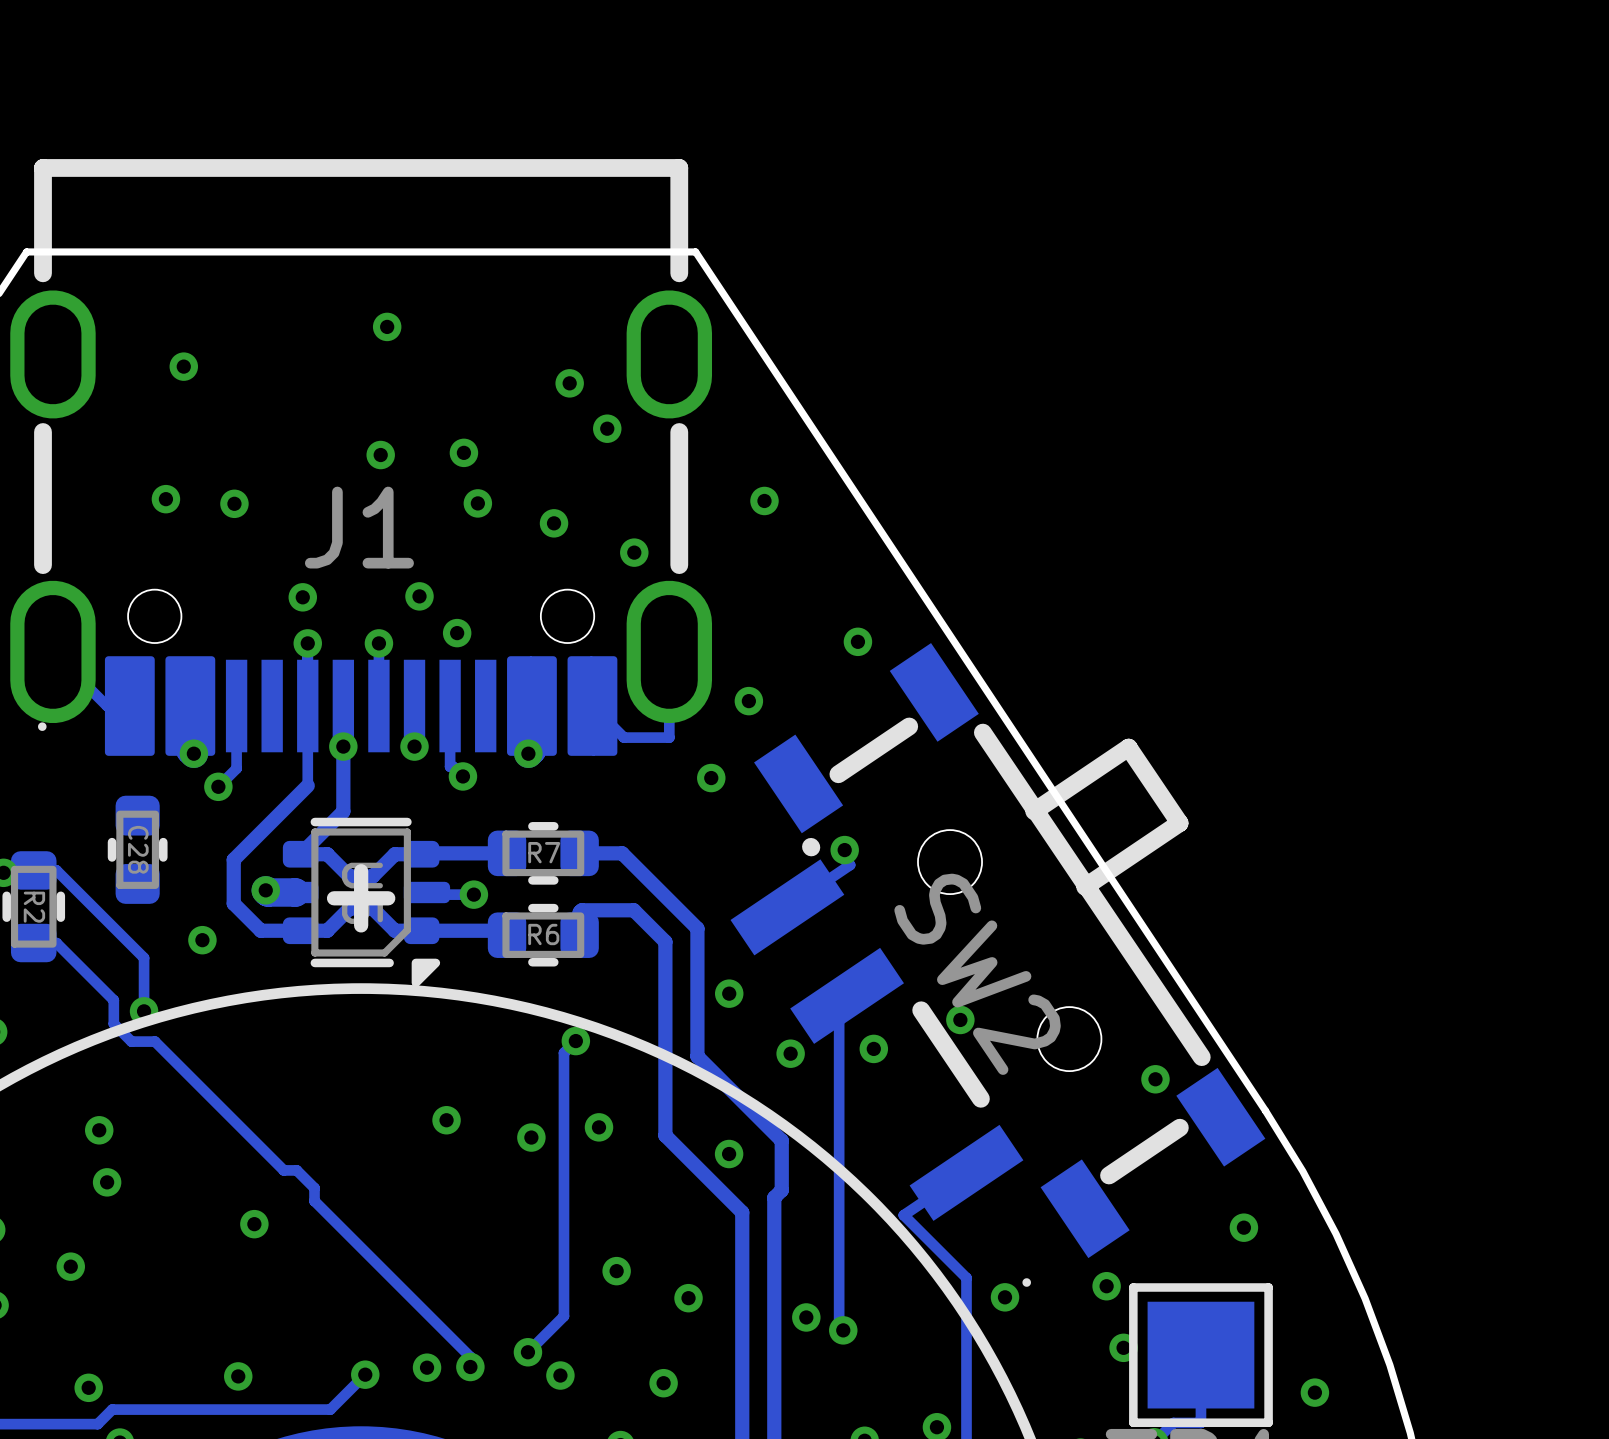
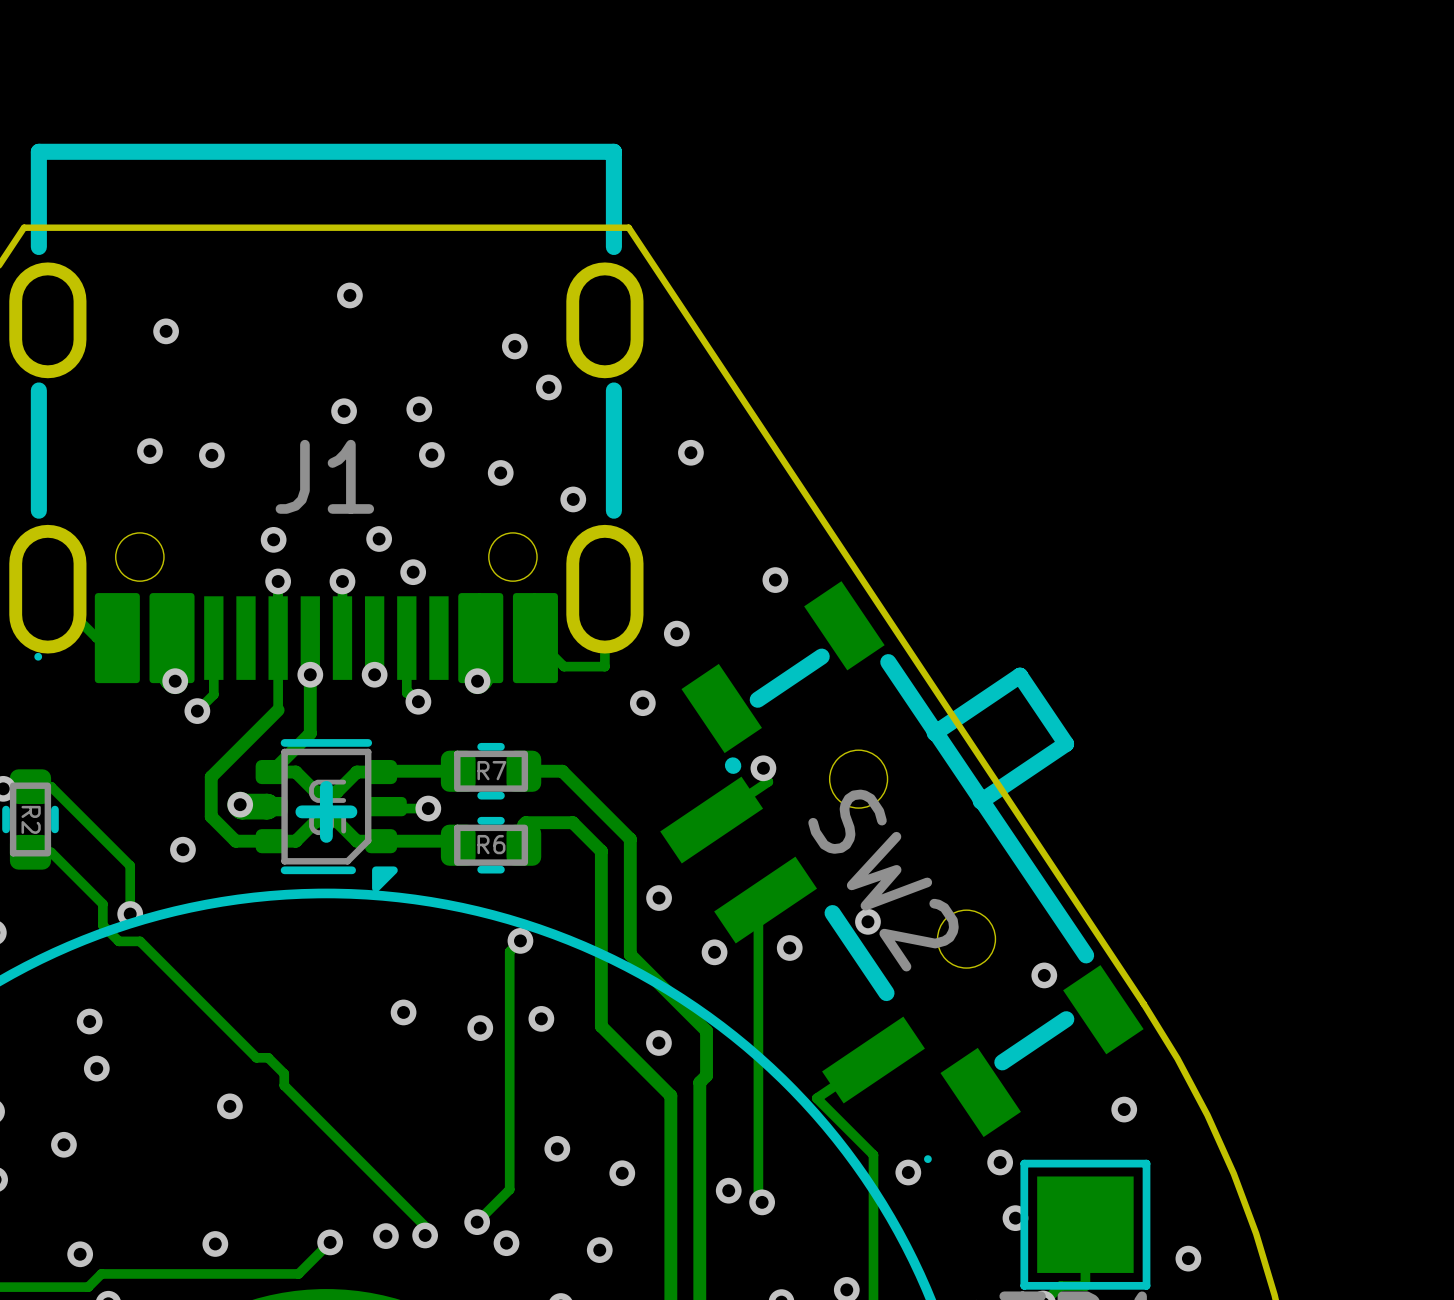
C28: (137, 849) -> none

